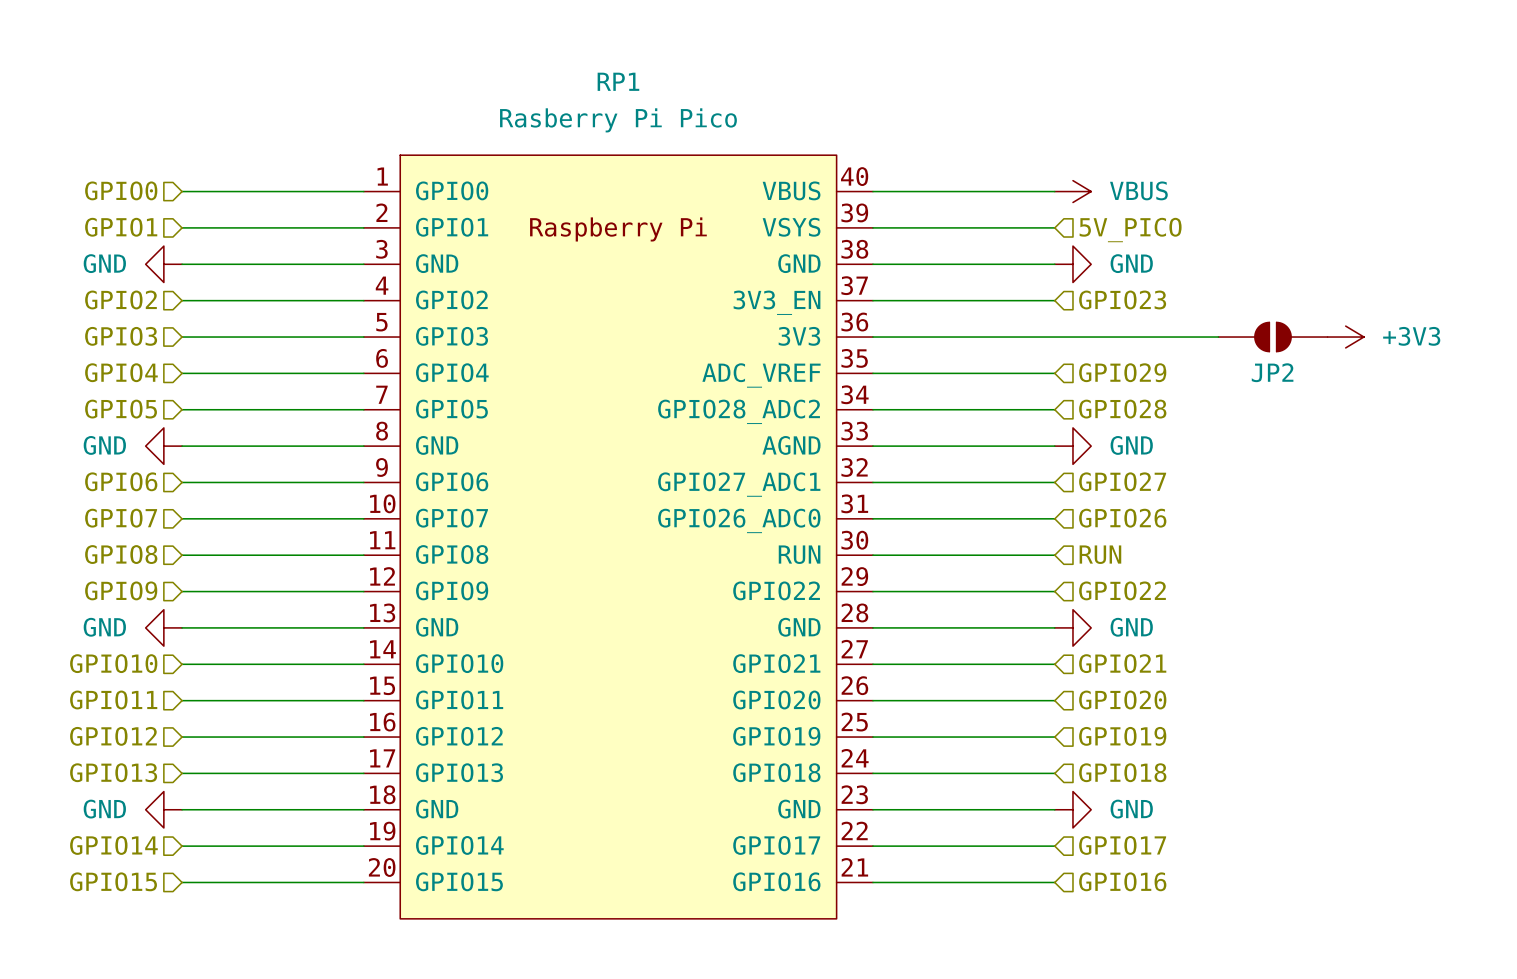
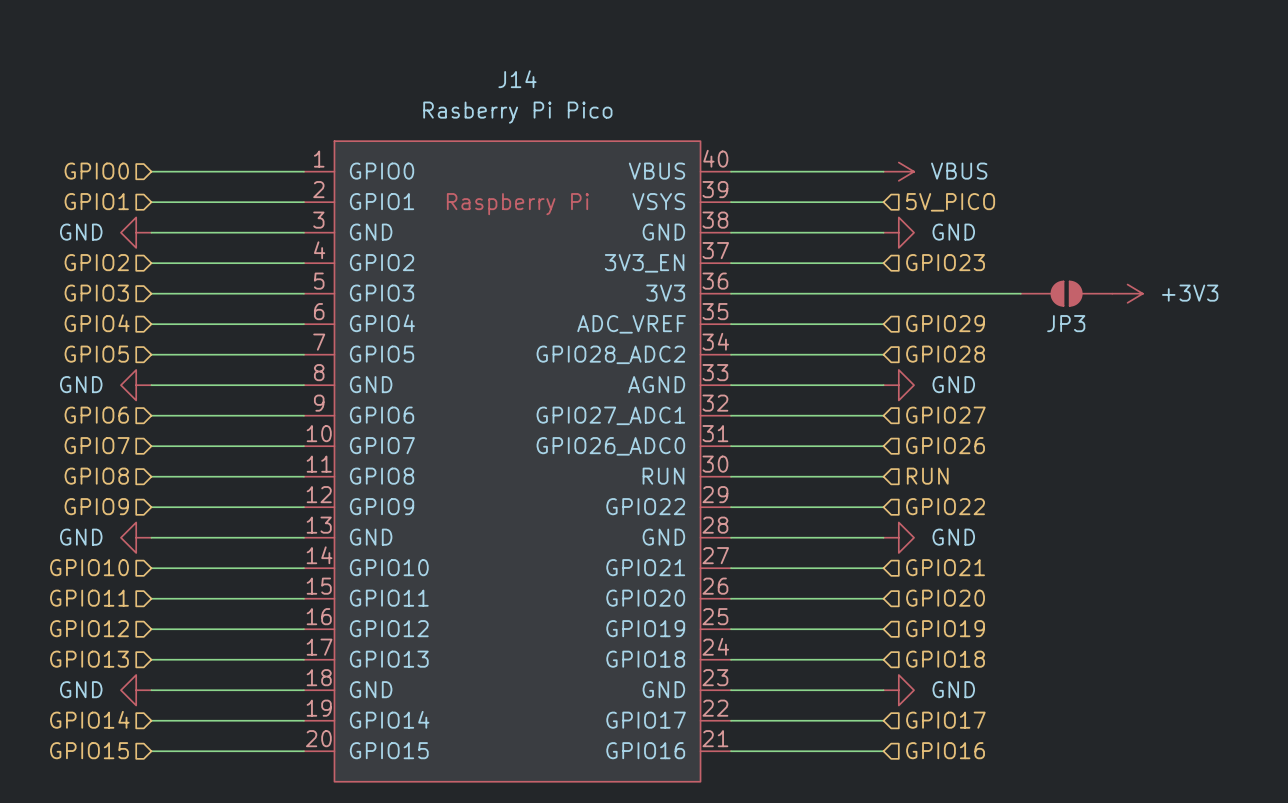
RP1 name: RP1 (618, 81) -> J14 (517, 79)
JP2 name: JP2 (1272, 372) -> JP3 (1066, 323)

